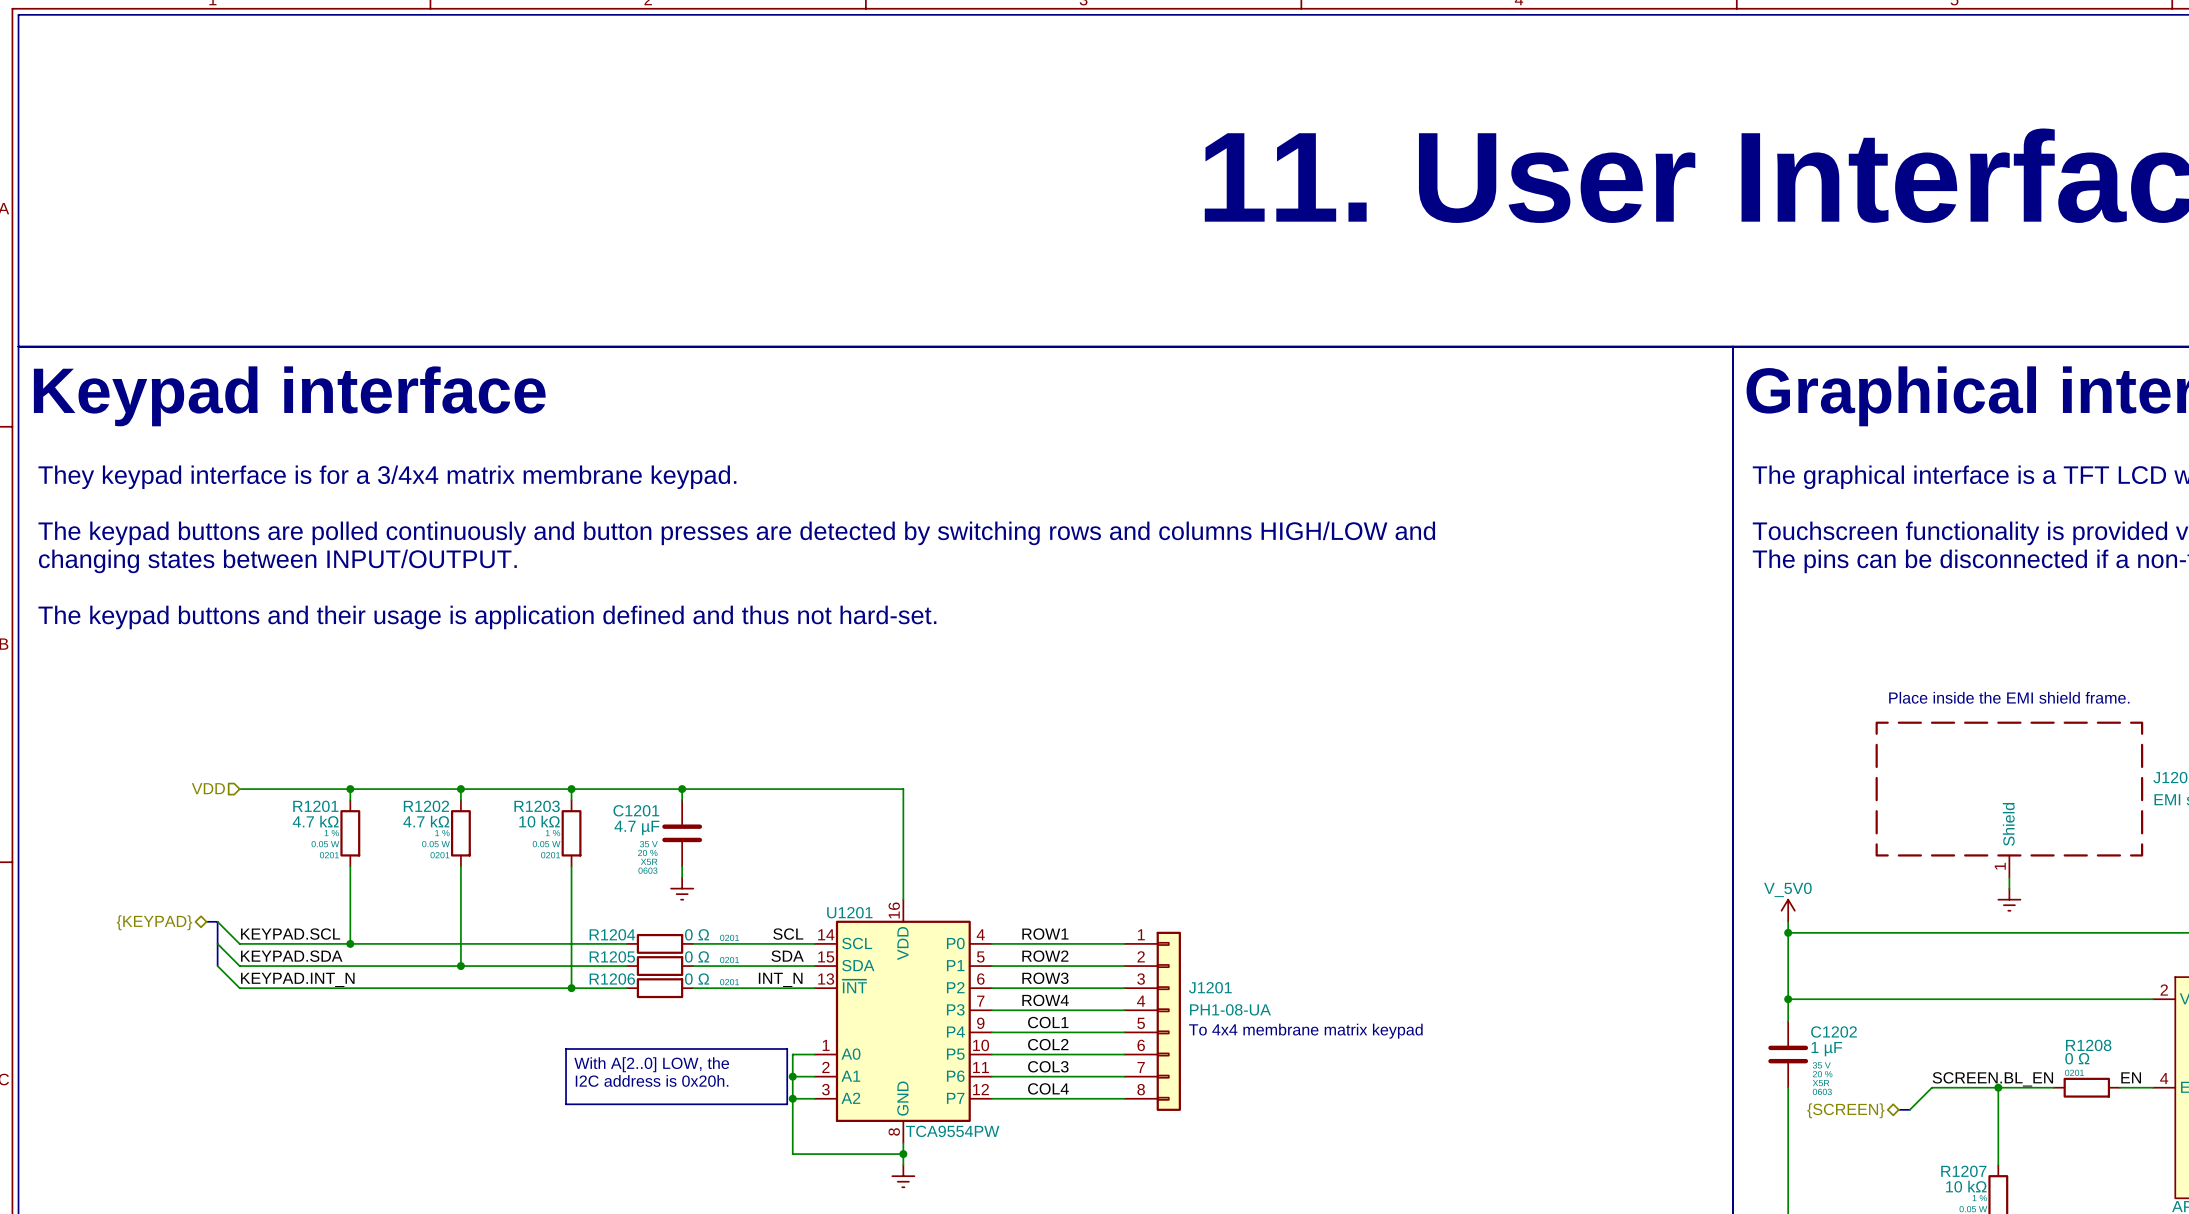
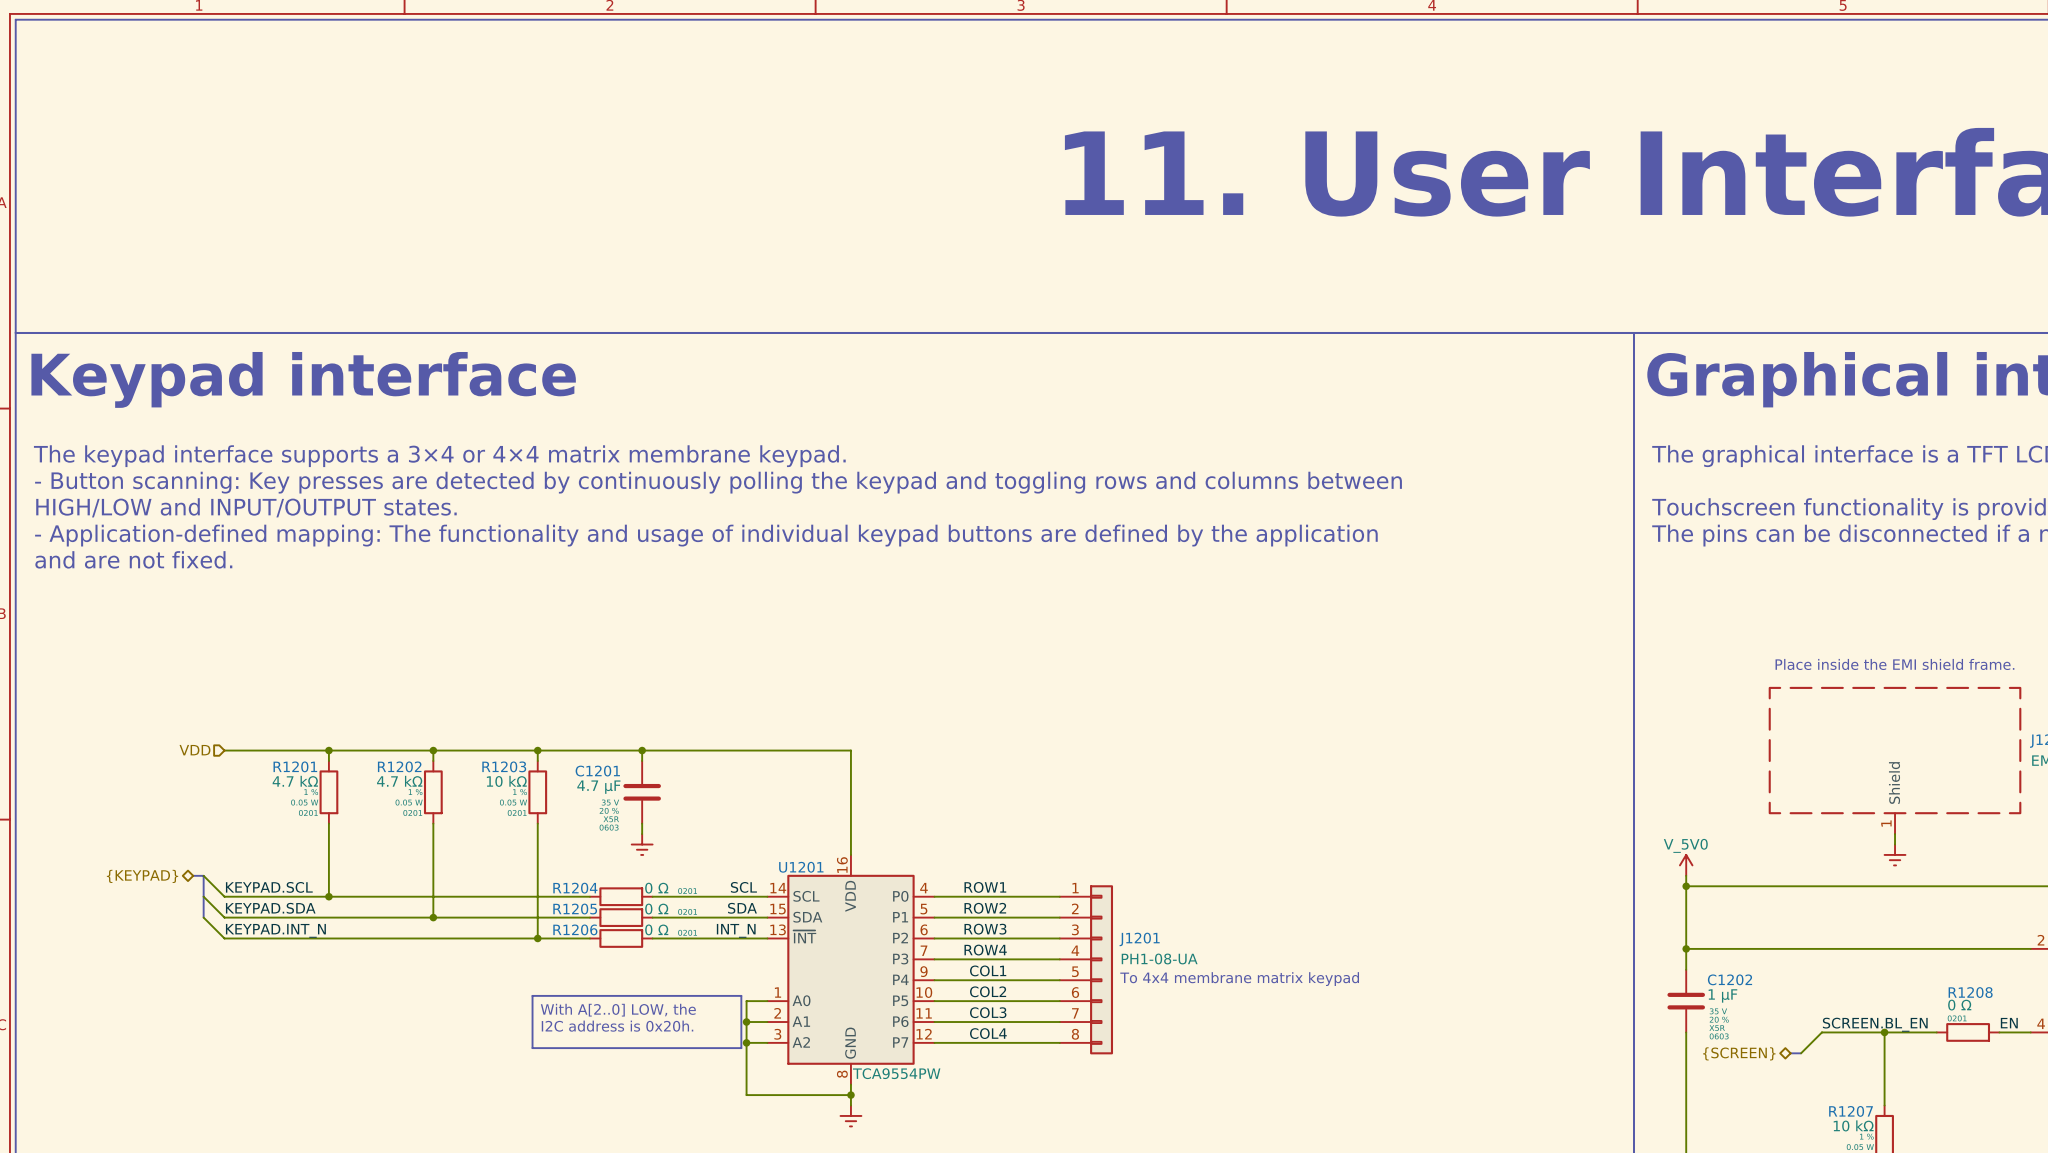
text: They keypad interface is for a 3/4x4 matrix membrane keypad. (387, 477) -> The keypad interface supports a 3×4 or 4×4 matrix membrane keypad. (439, 456)
text: none -> - Button scanning: Key presses are detected by continuously polling the keypad and toggling rows and columns between (718, 482)
text: The keypad buttons are polled continuously and button presses are detected by switching rows and columns HIGH/LOW and (736, 533) -> HIGH/LOW and INPUT/OUTPUT states. (246, 507)
text: changing states between INPUT/OUTPUT. (277, 561) -> - Application-defined mapping: The functionality and usage of individual keypad buttons are defined by the application (706, 535)
text: none -> and are not fixed. (133, 559)
text: The keypad buttons and their usage is application defined and thus not hard-set. (487, 617) -> none

